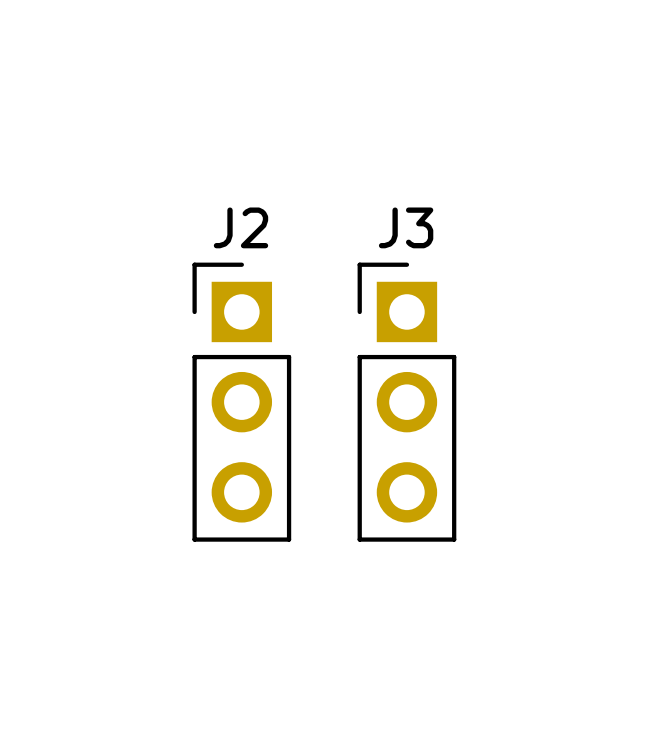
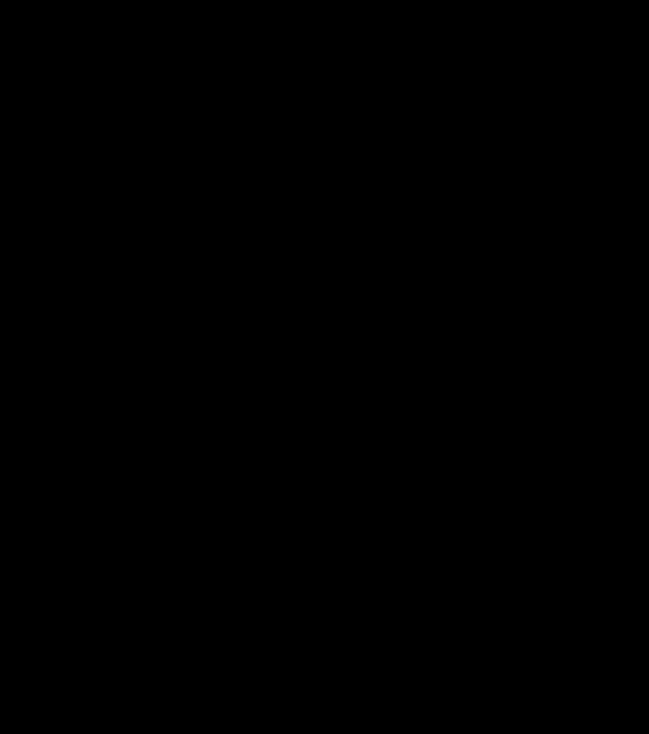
J2: (241, 402) -> none
J3: (406, 402) -> none

